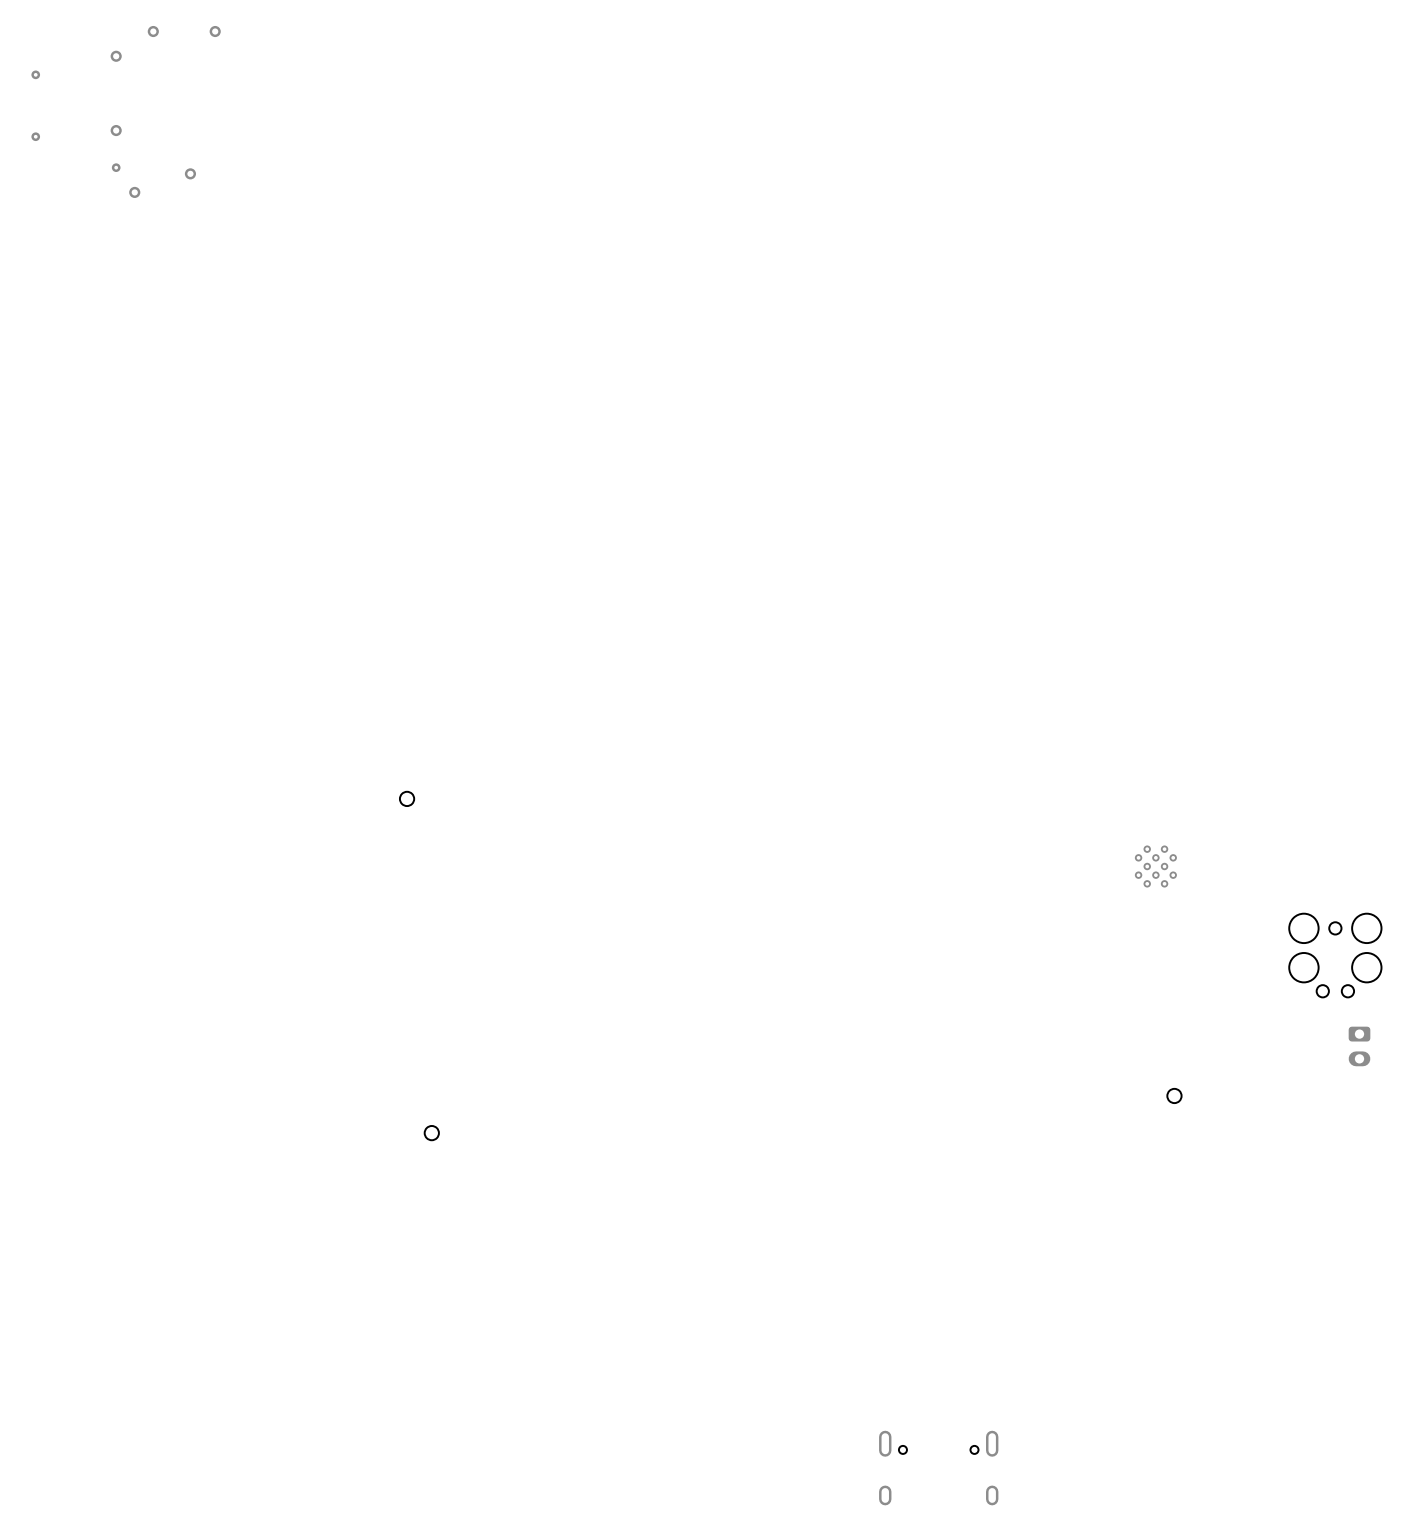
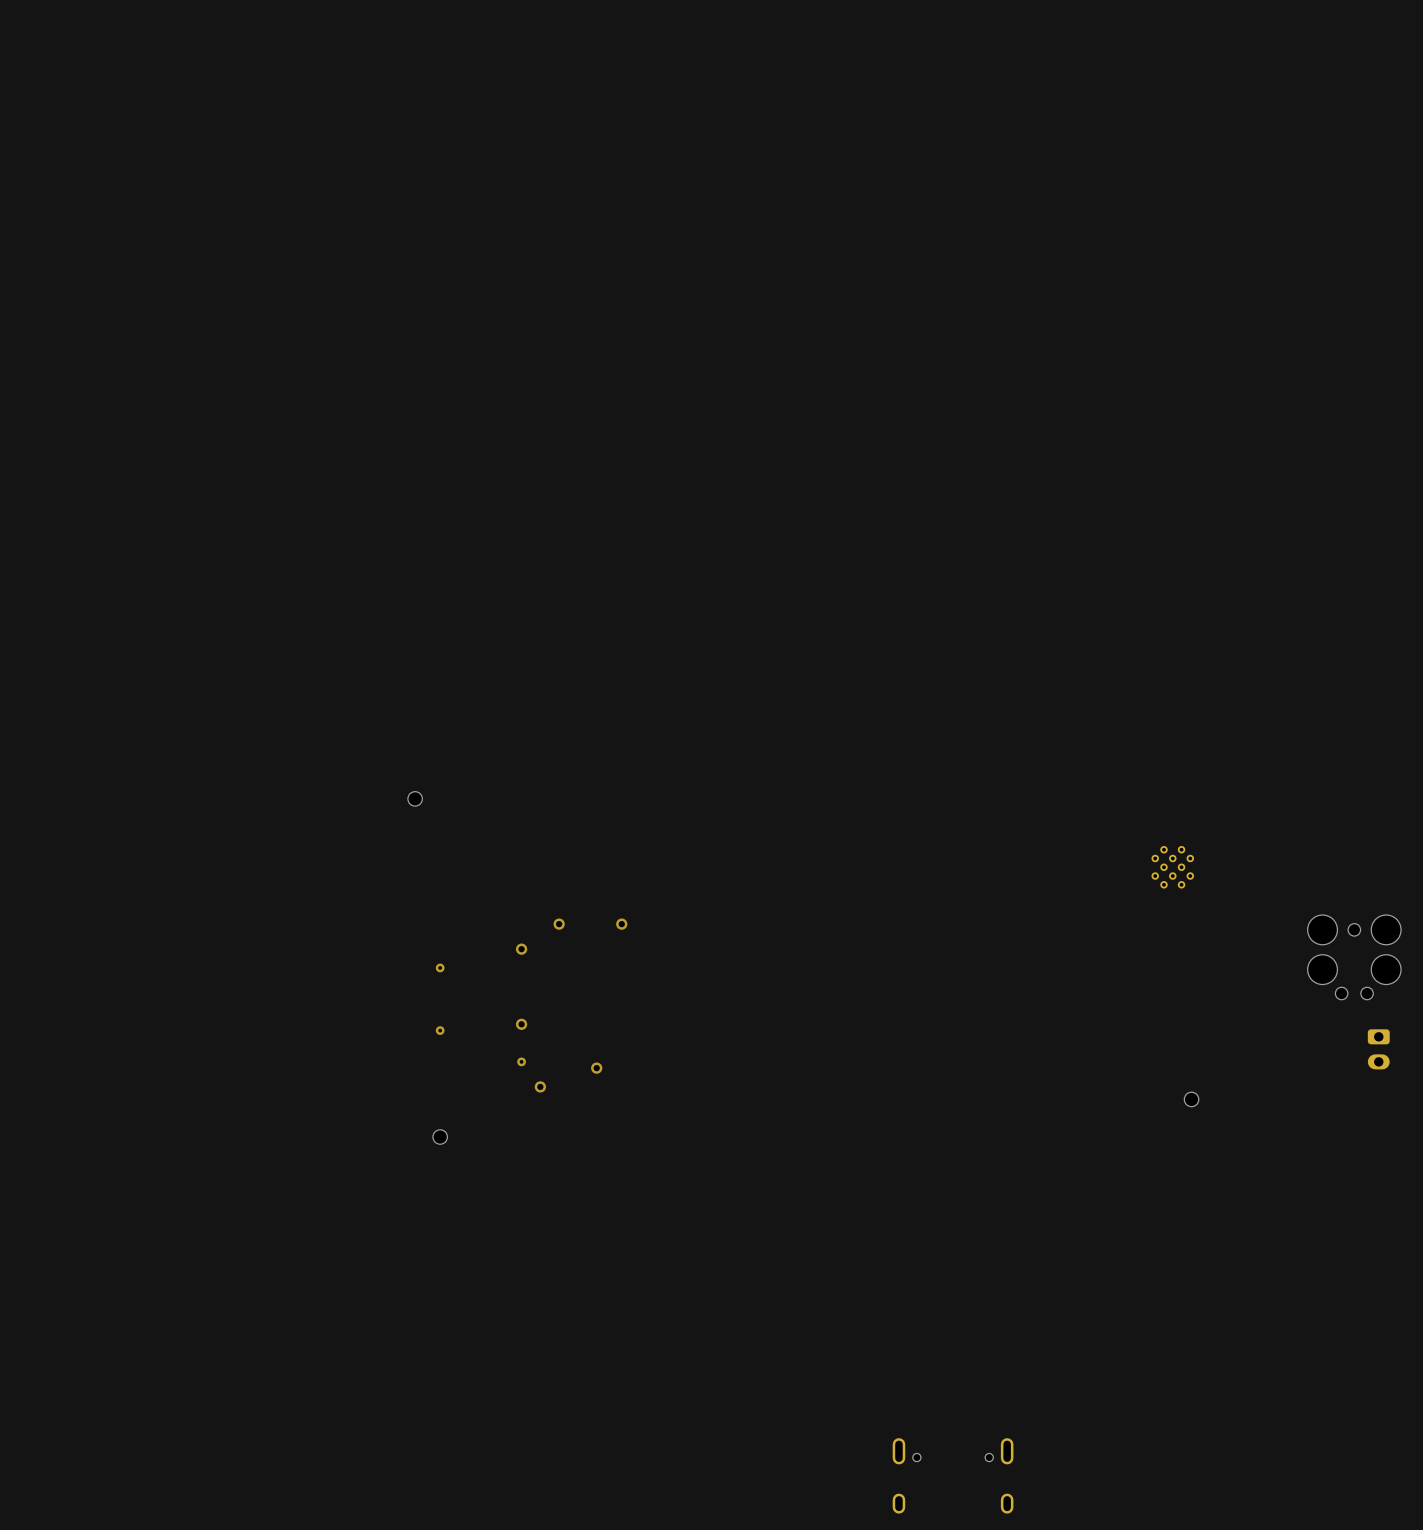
via: (153, 31) -> none
via: (215, 31) -> none
via: (116, 56) -> none
via: (35, 74) -> none
via: (116, 130) -> none
via: (35, 136) -> none
via: (116, 167) -> none
via: (190, 173) -> none
via: (134, 192) -> none
via: none -> (559, 924)
via: none -> (621, 924)
via: none -> (521, 949)
via: none -> (440, 967)
via: none -> (521, 1024)
via: none -> (440, 1030)
via: none -> (521, 1061)
via: none -> (596, 1068)
via: none -> (540, 1086)

